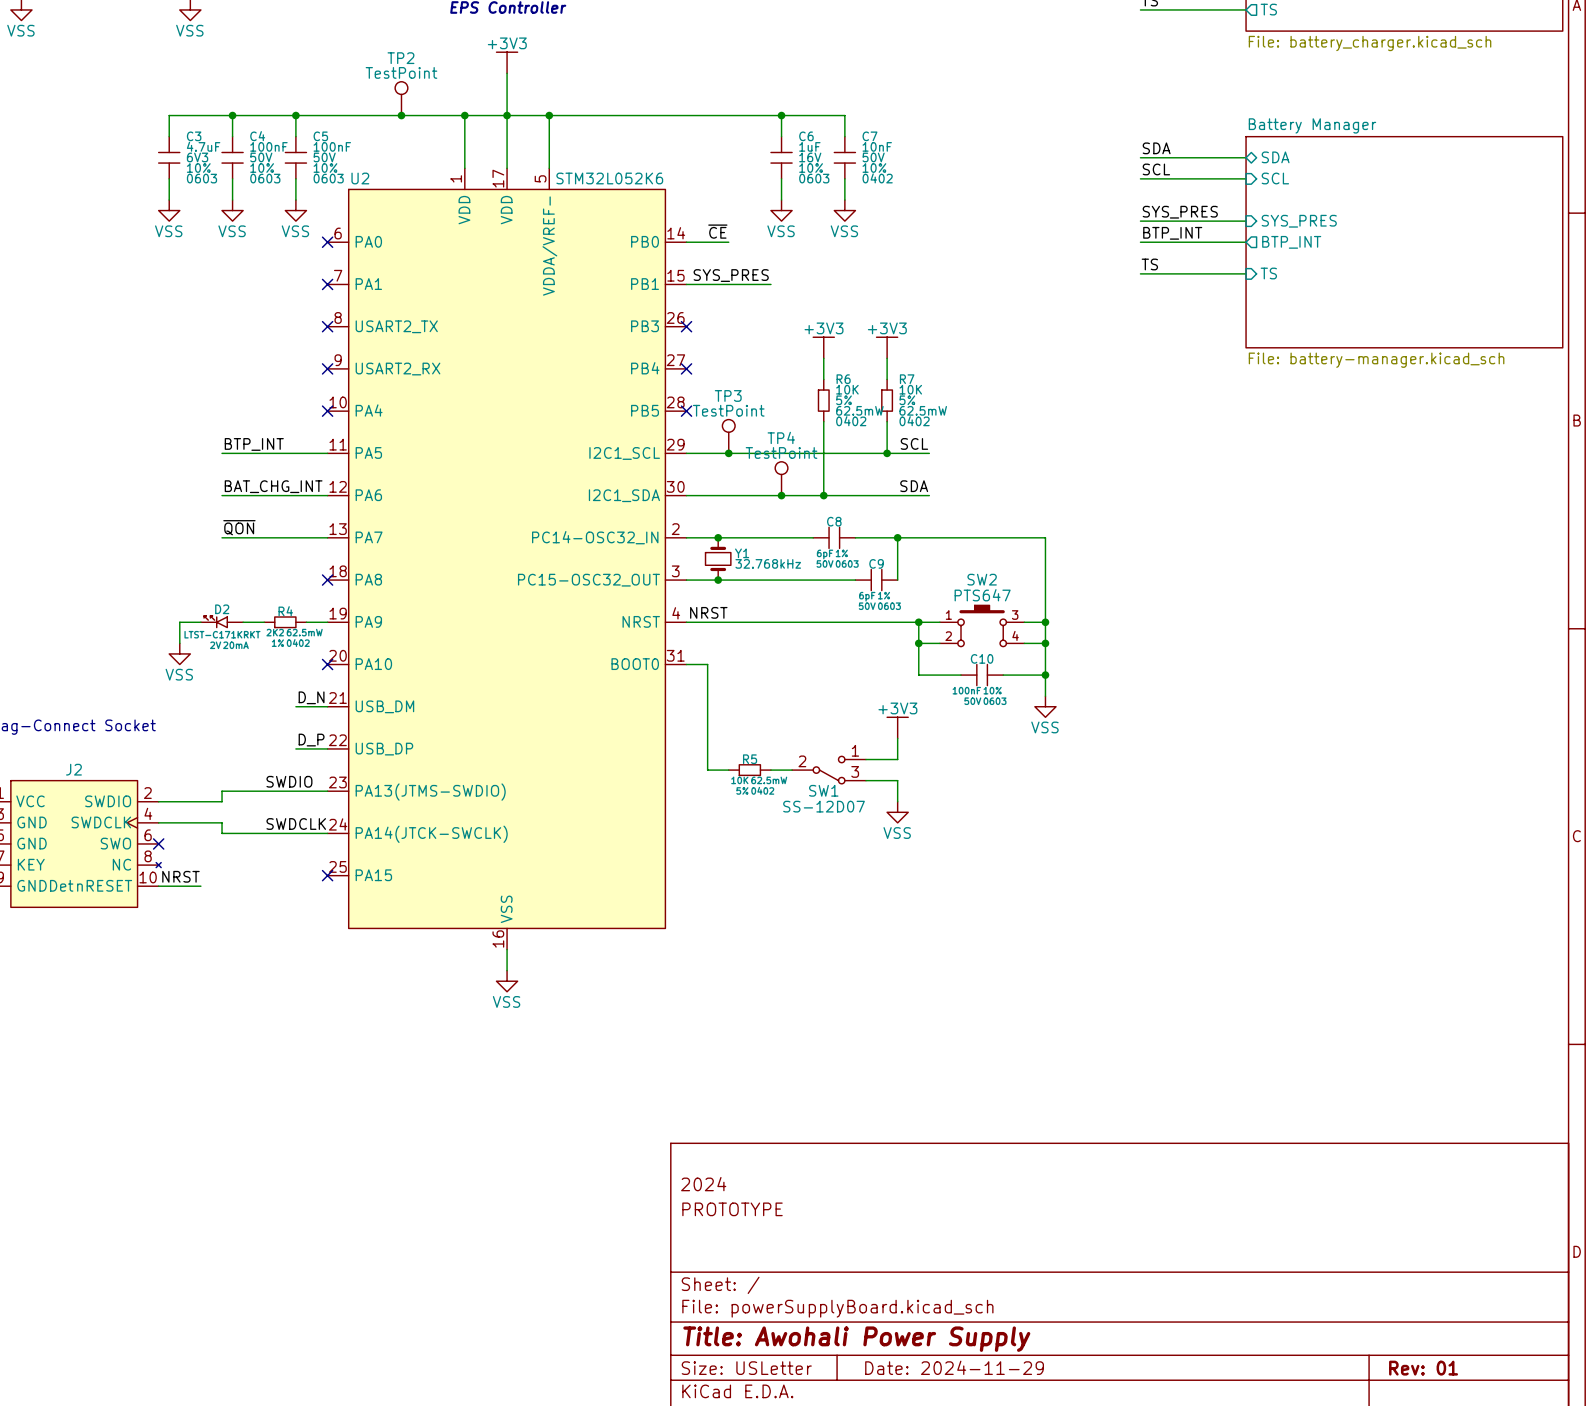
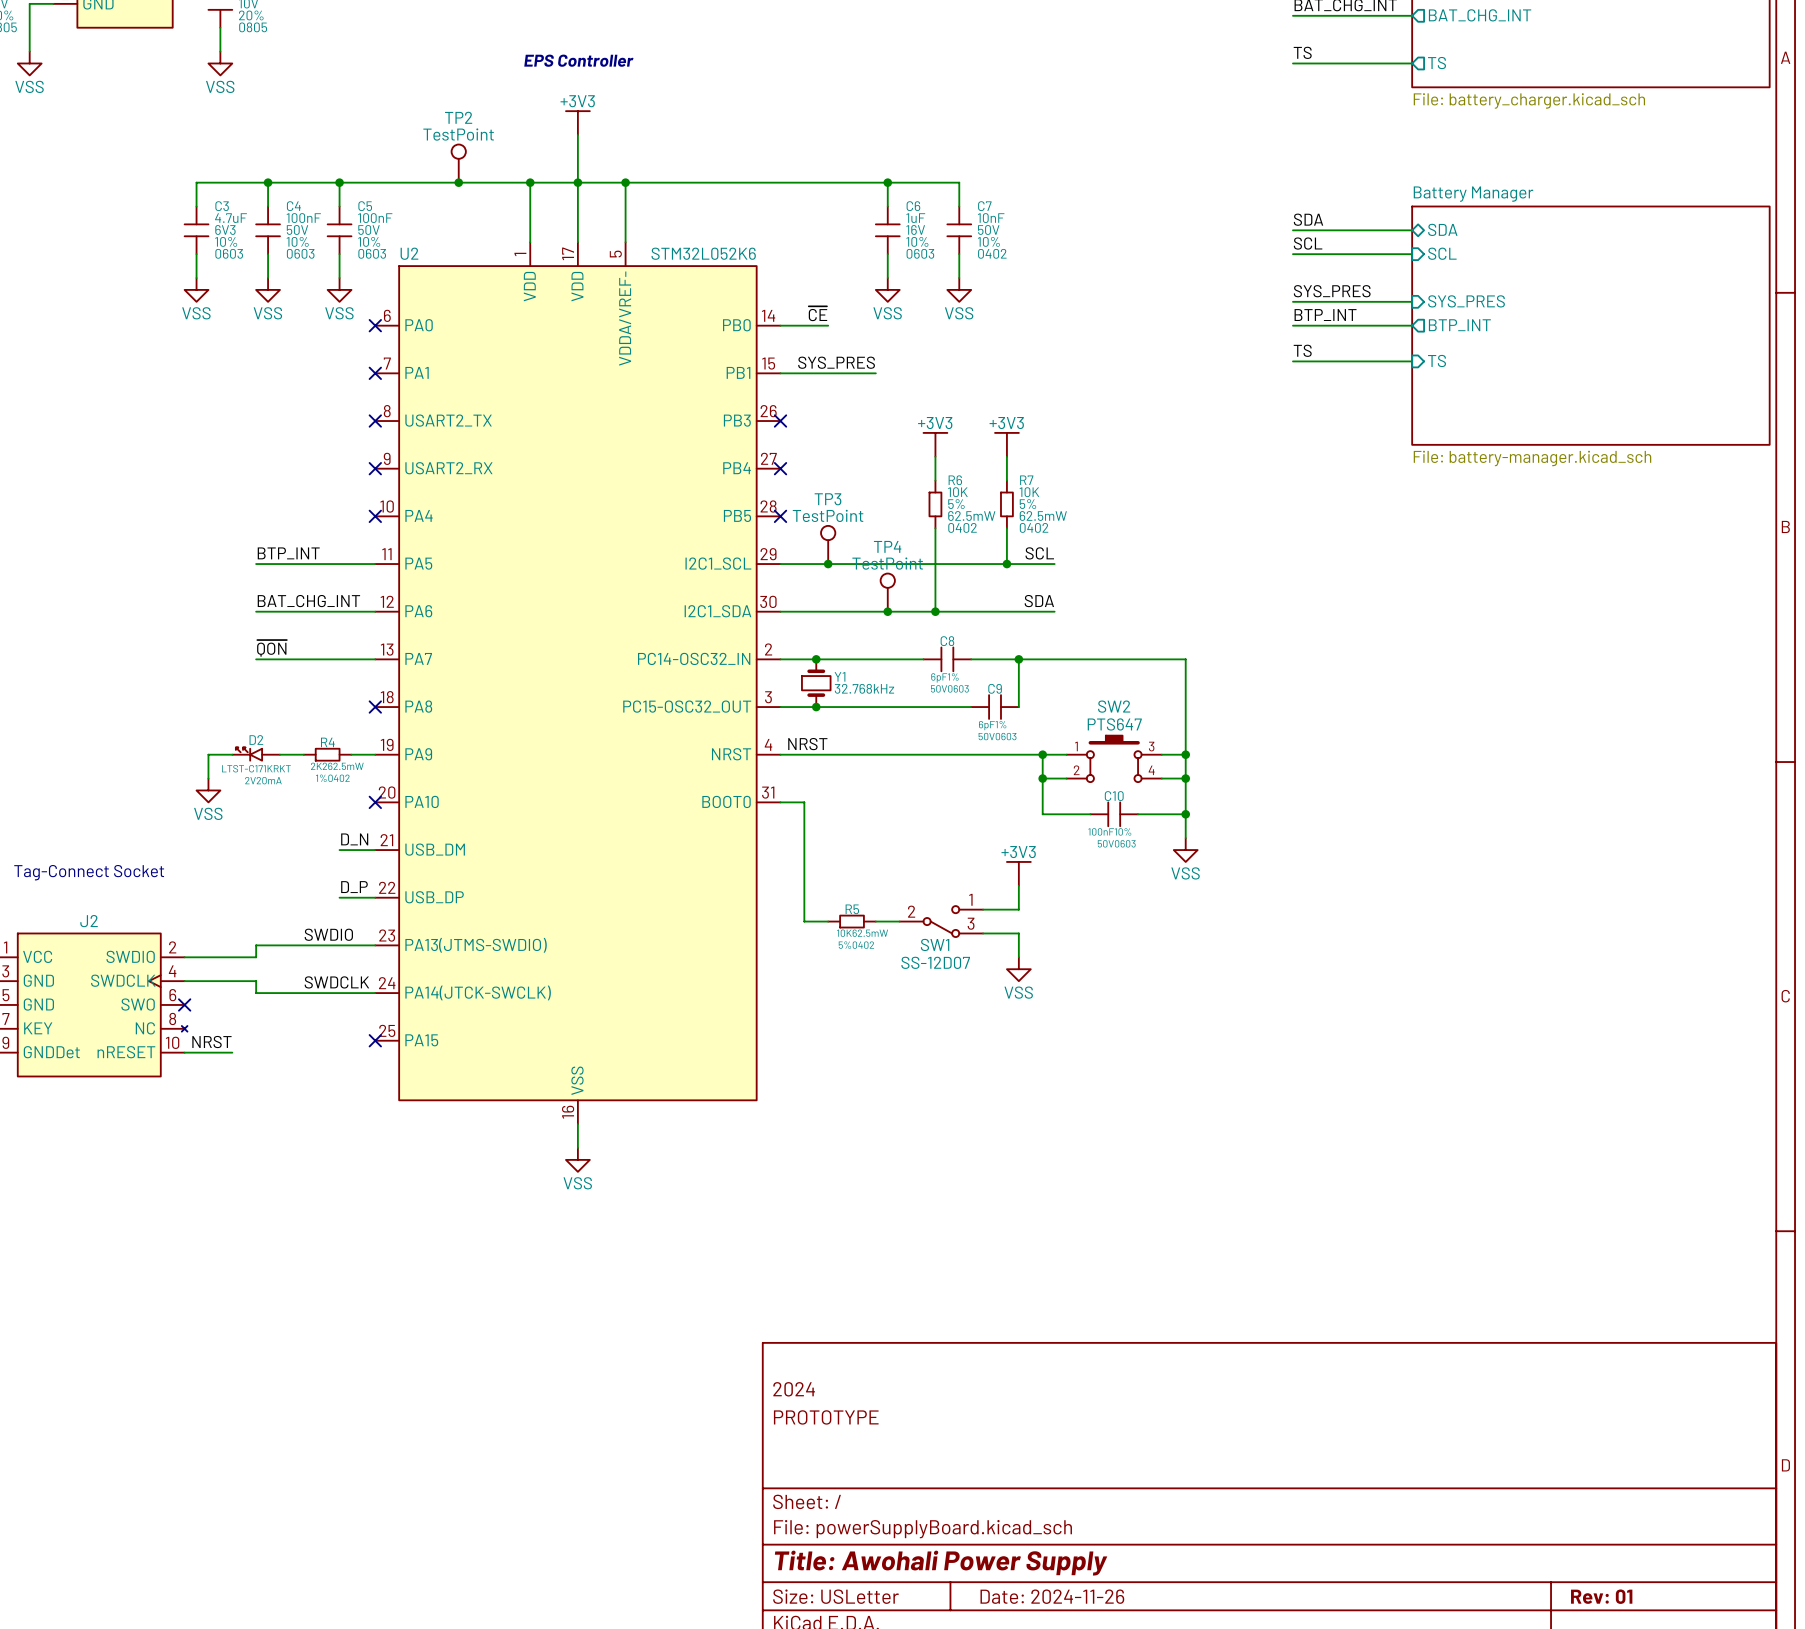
title block: Date: 2024-11-29 (954, 1367) -> Date: 2024-11-26 (1052, 1596)

